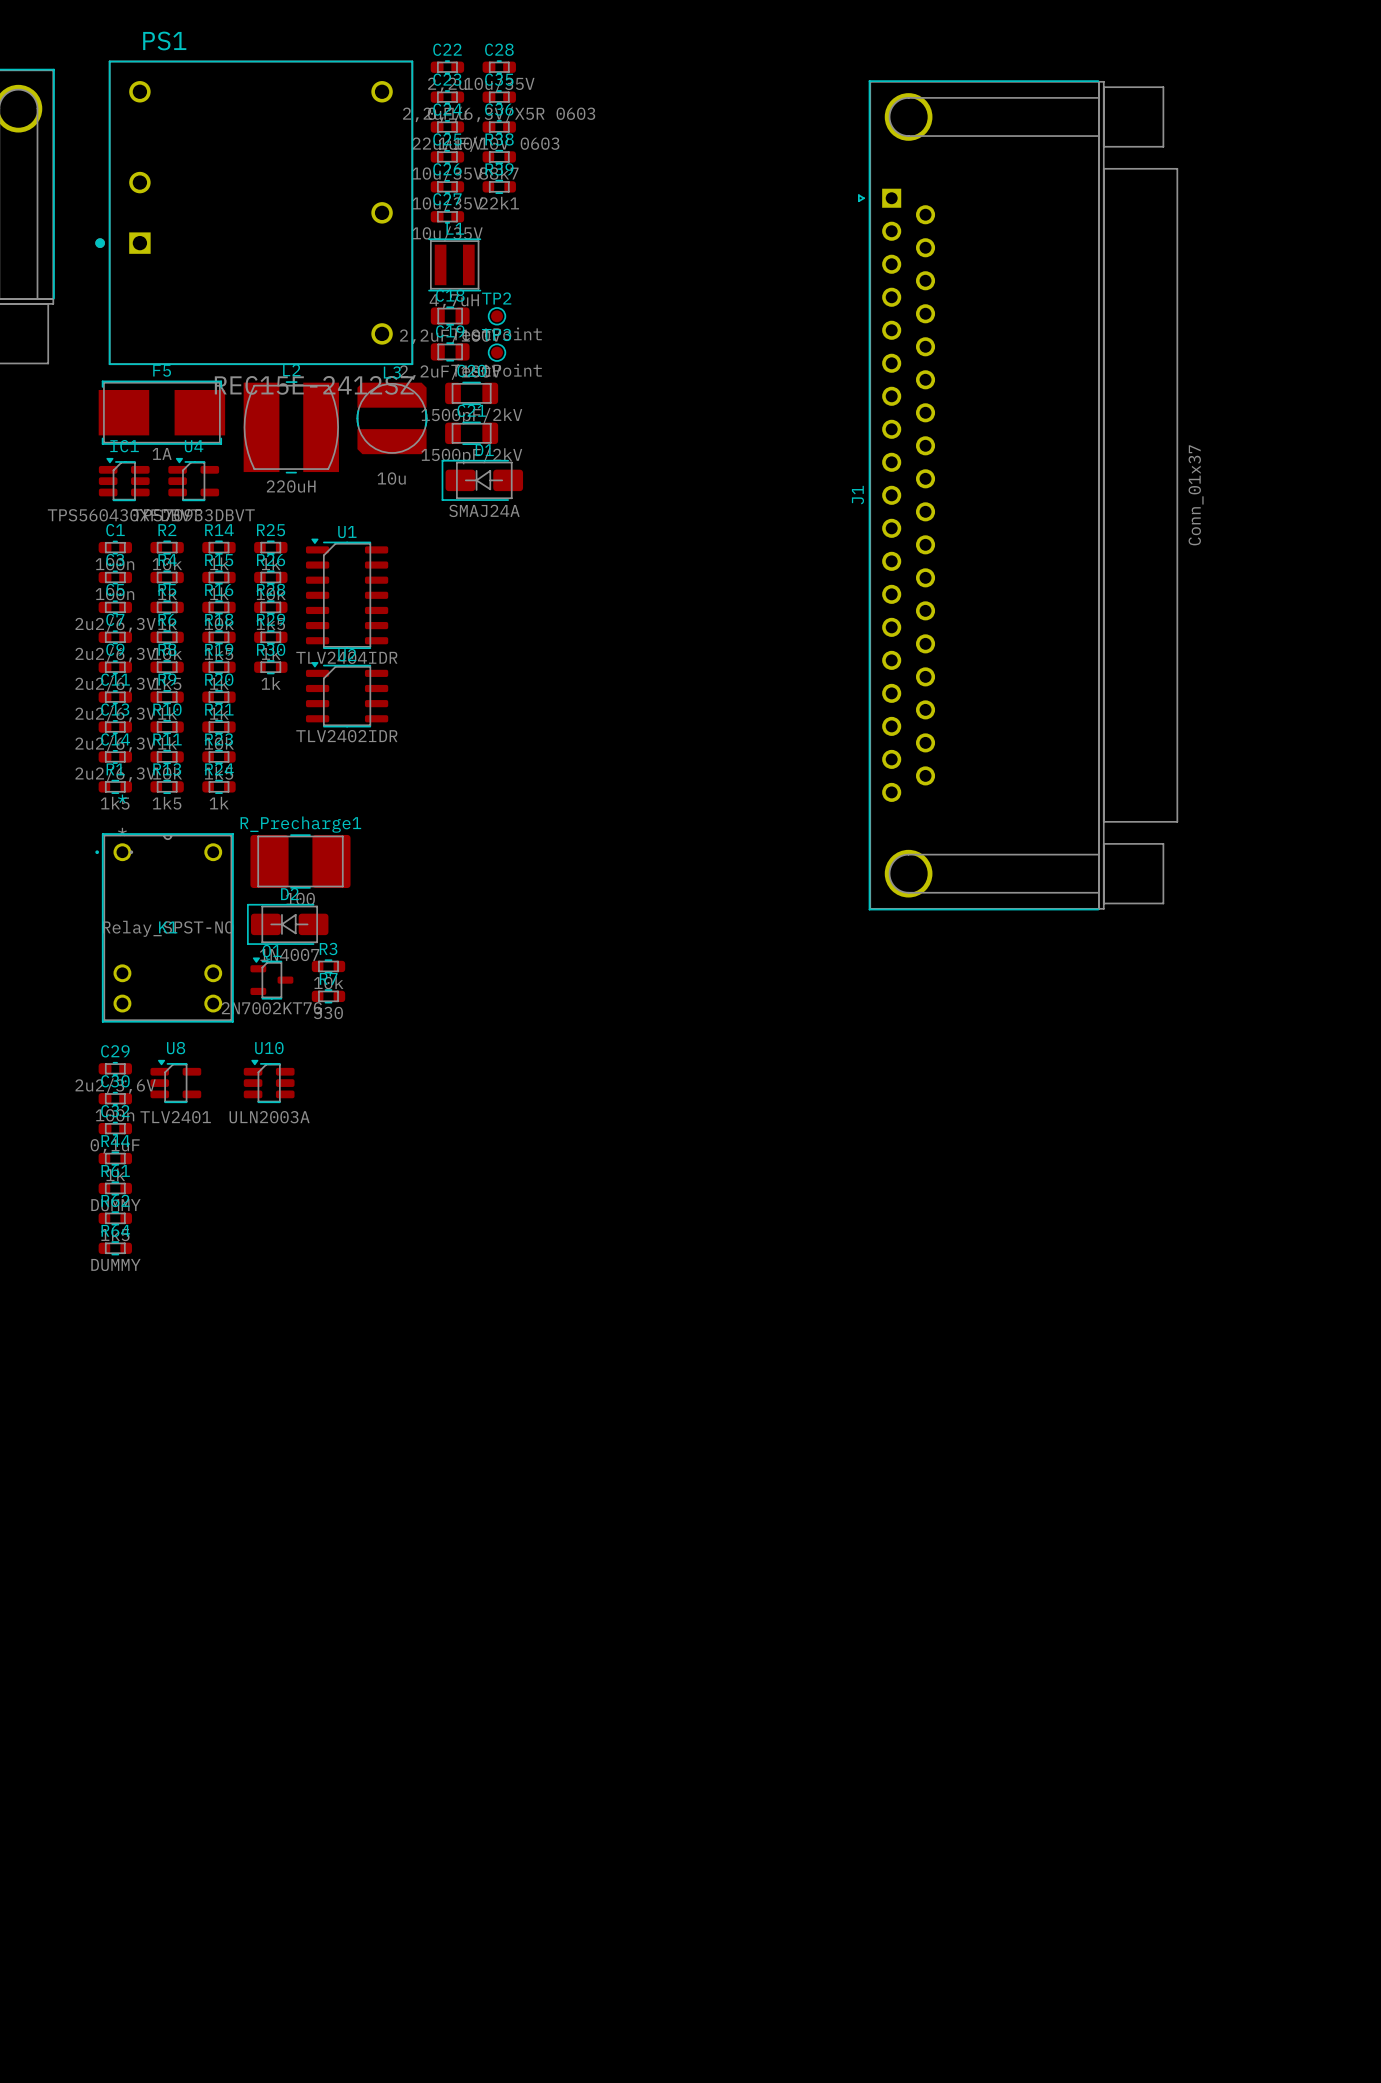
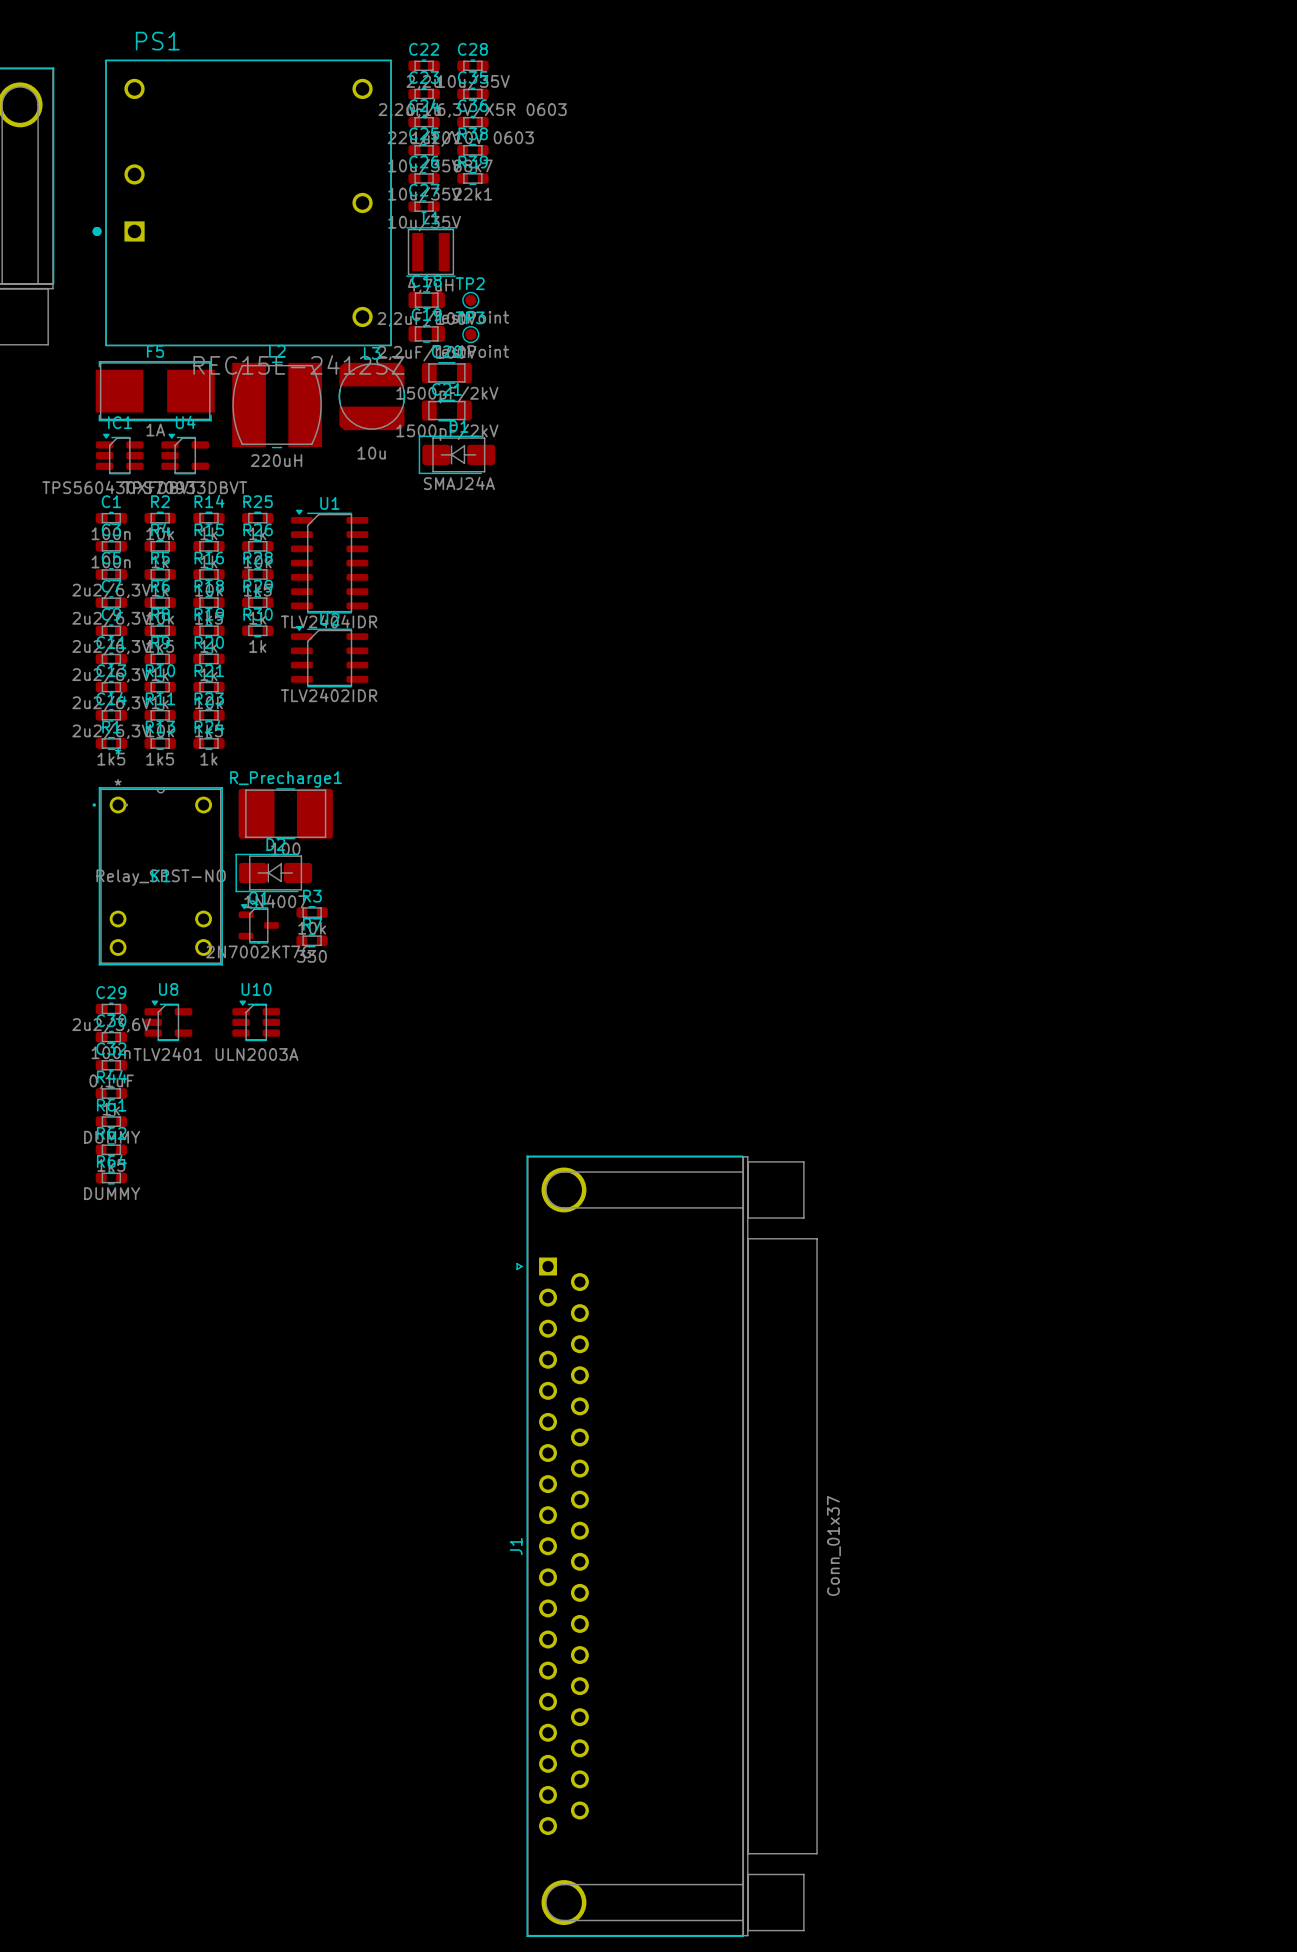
J1 position: (1018, 495) -> (667, 1546)

